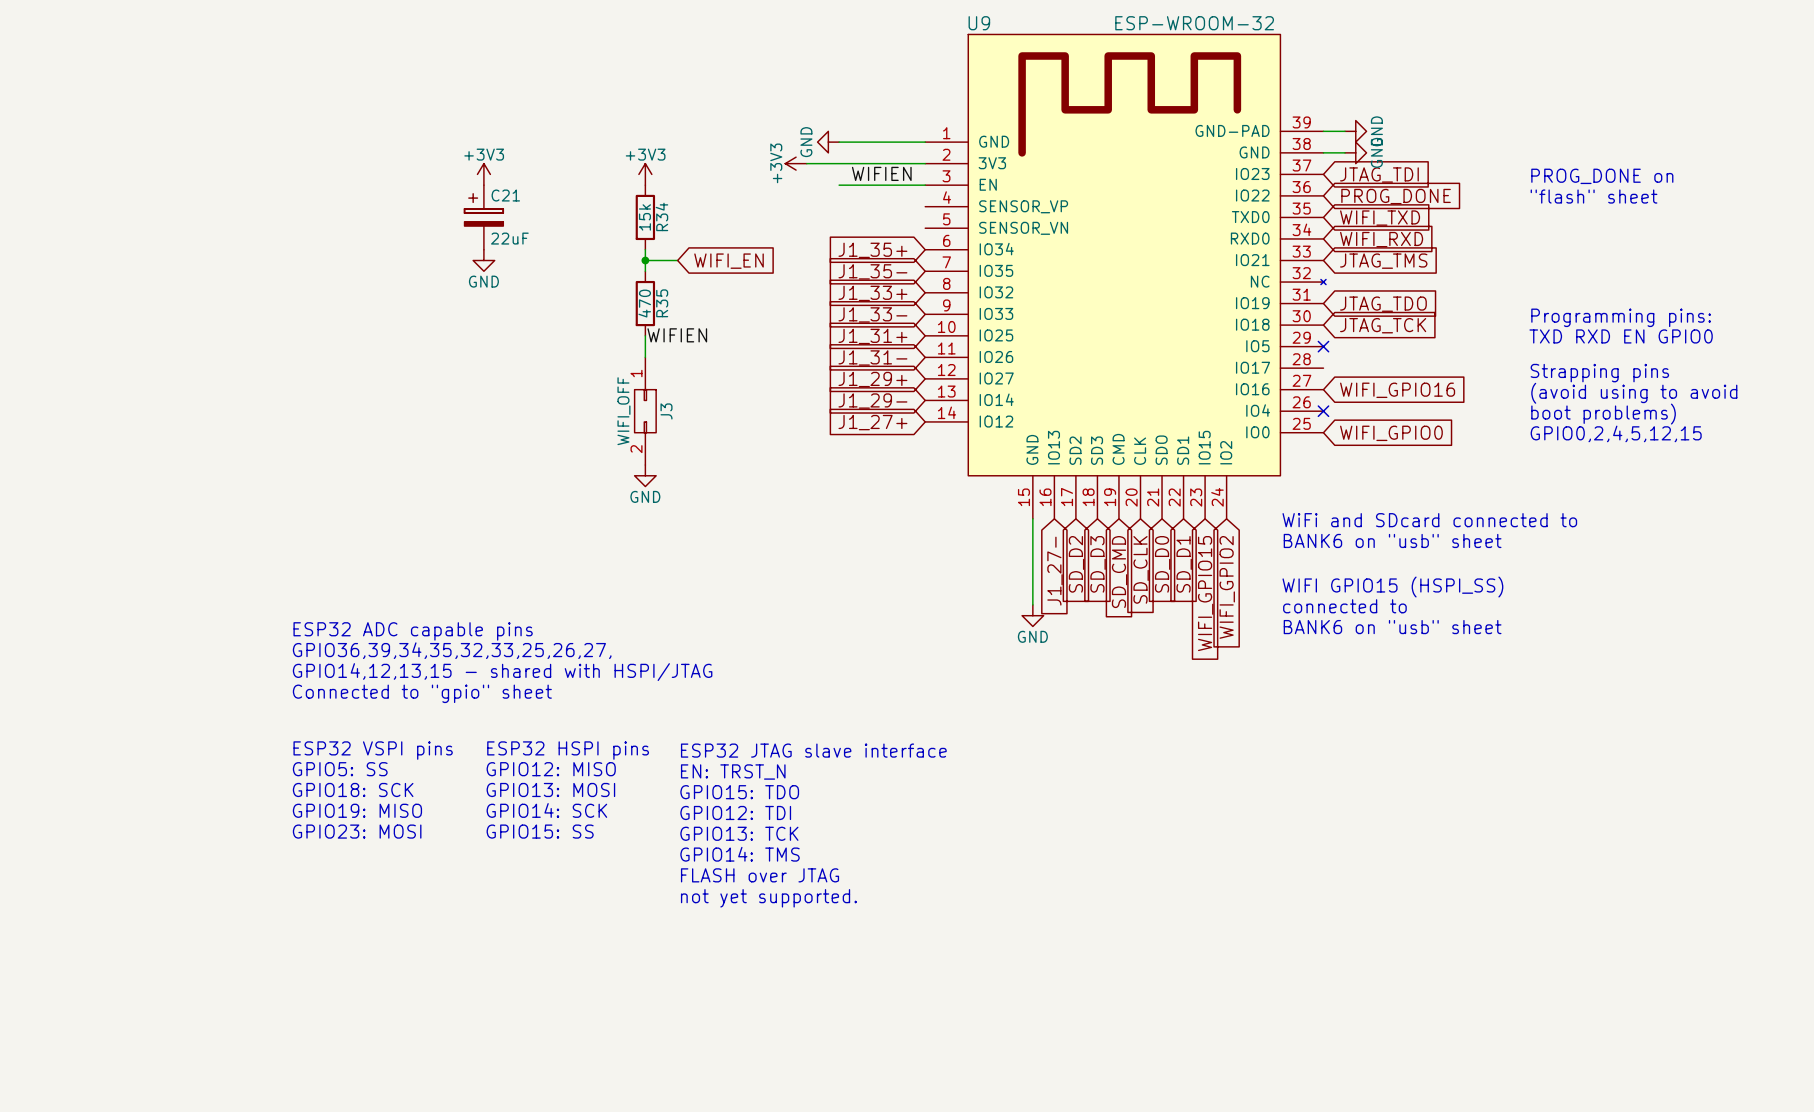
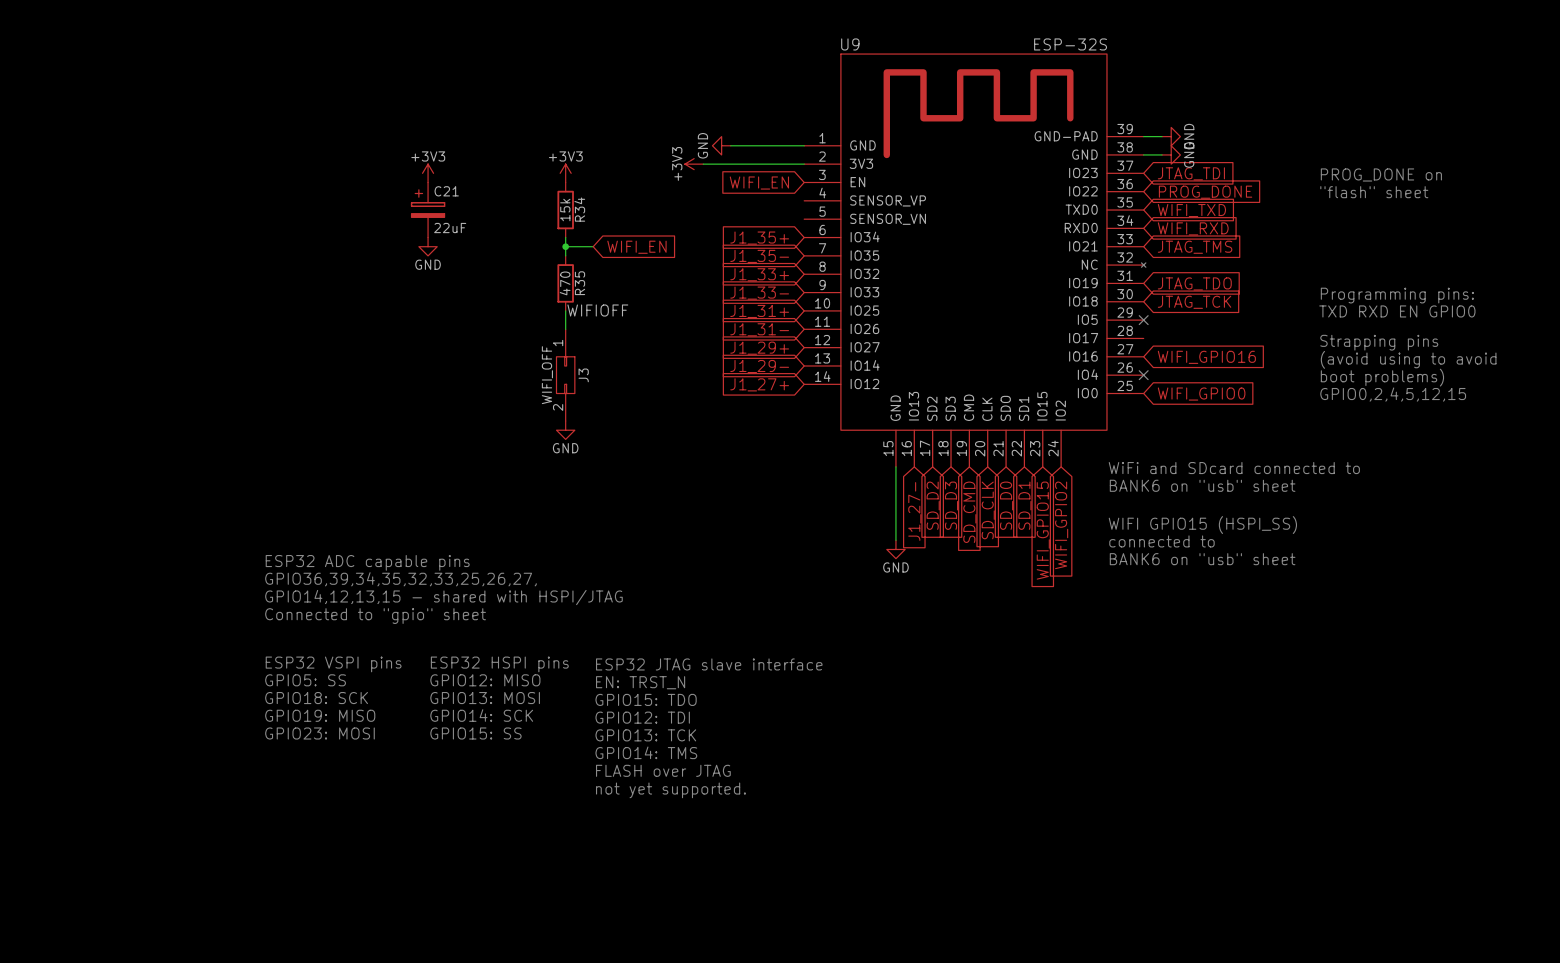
U9 value: ESP-WROOM-32 (1194, 23) -> ESP-32S (1070, 44)
label: WIFIEN (881, 173) -> none
wire: (839, 185) (925, 185) -> none
global label: none -> WIFI_EN (759, 183)
label: WIFIEN (677, 335) -> WIFIOFF (597, 310)

